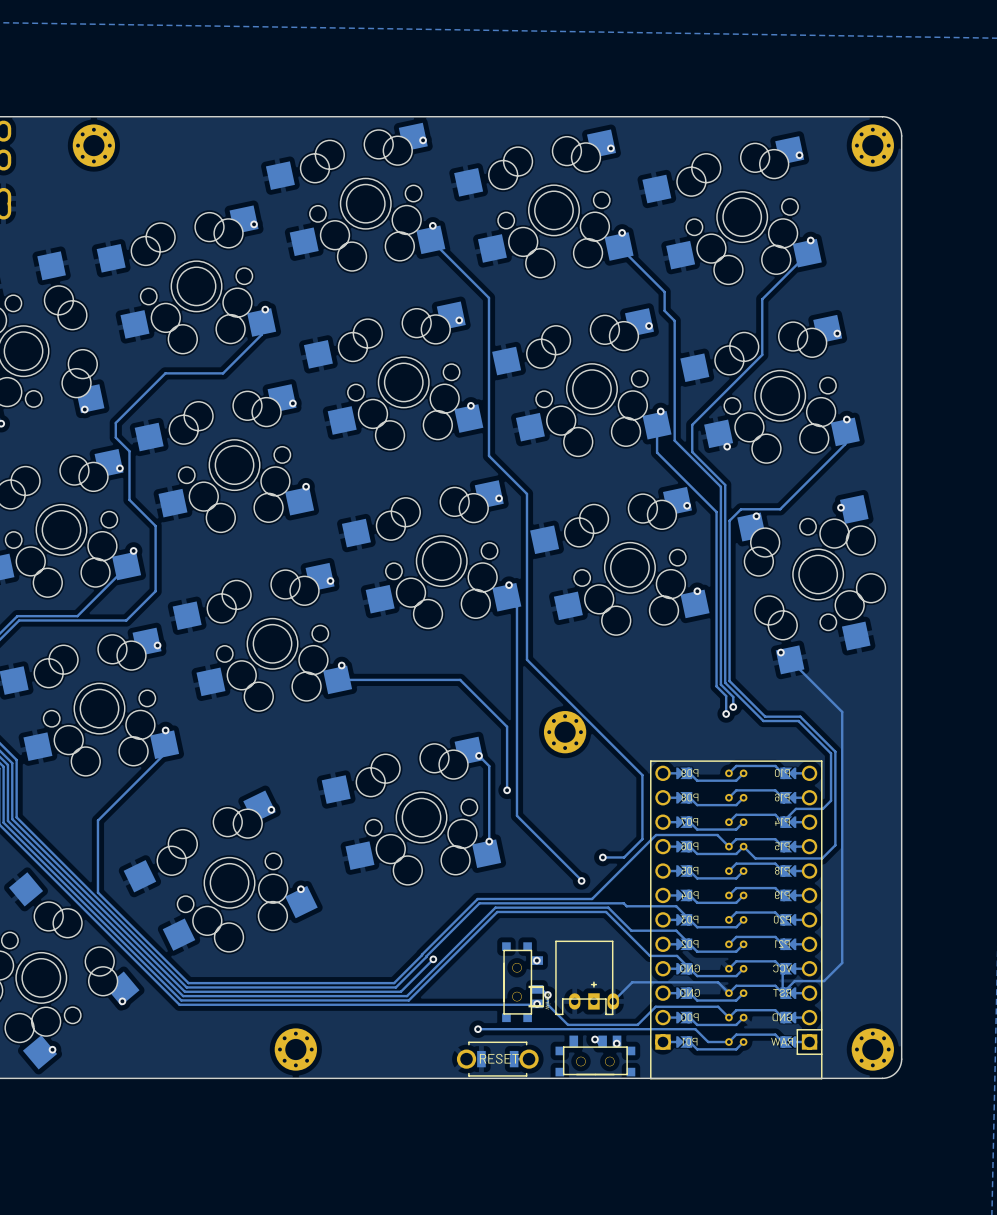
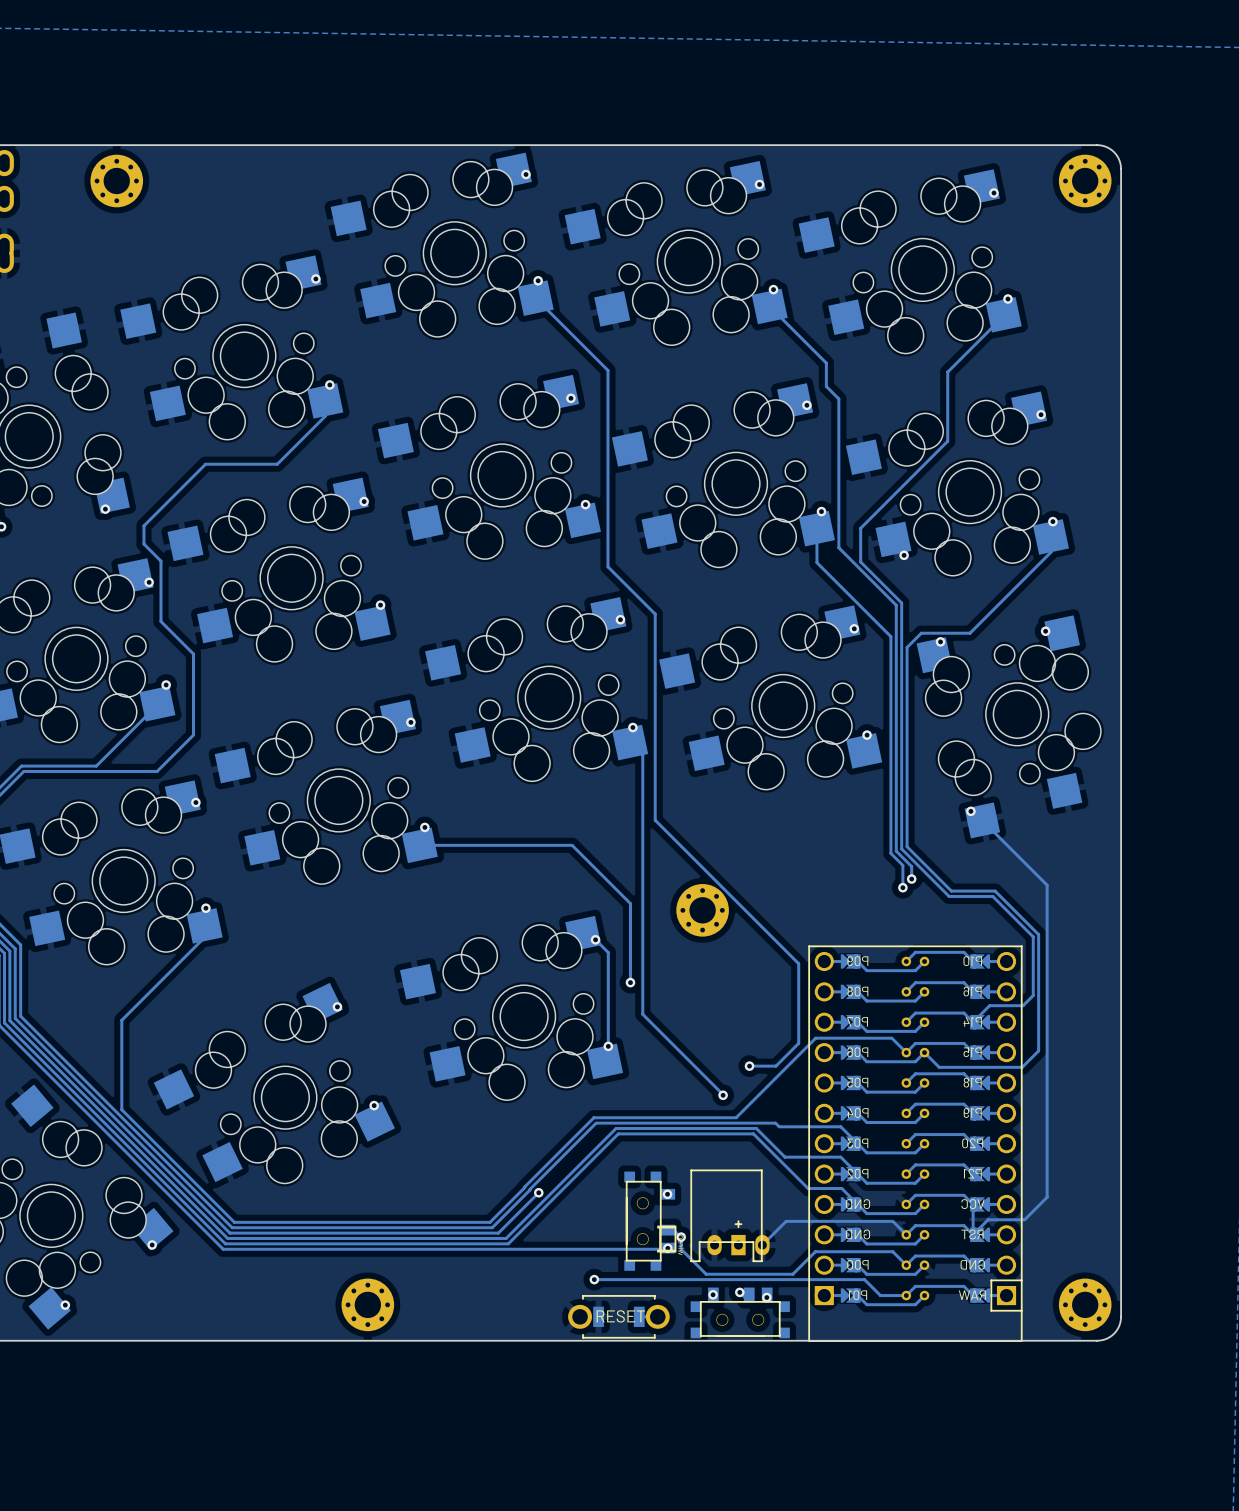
via: none -> (713, 1294)

